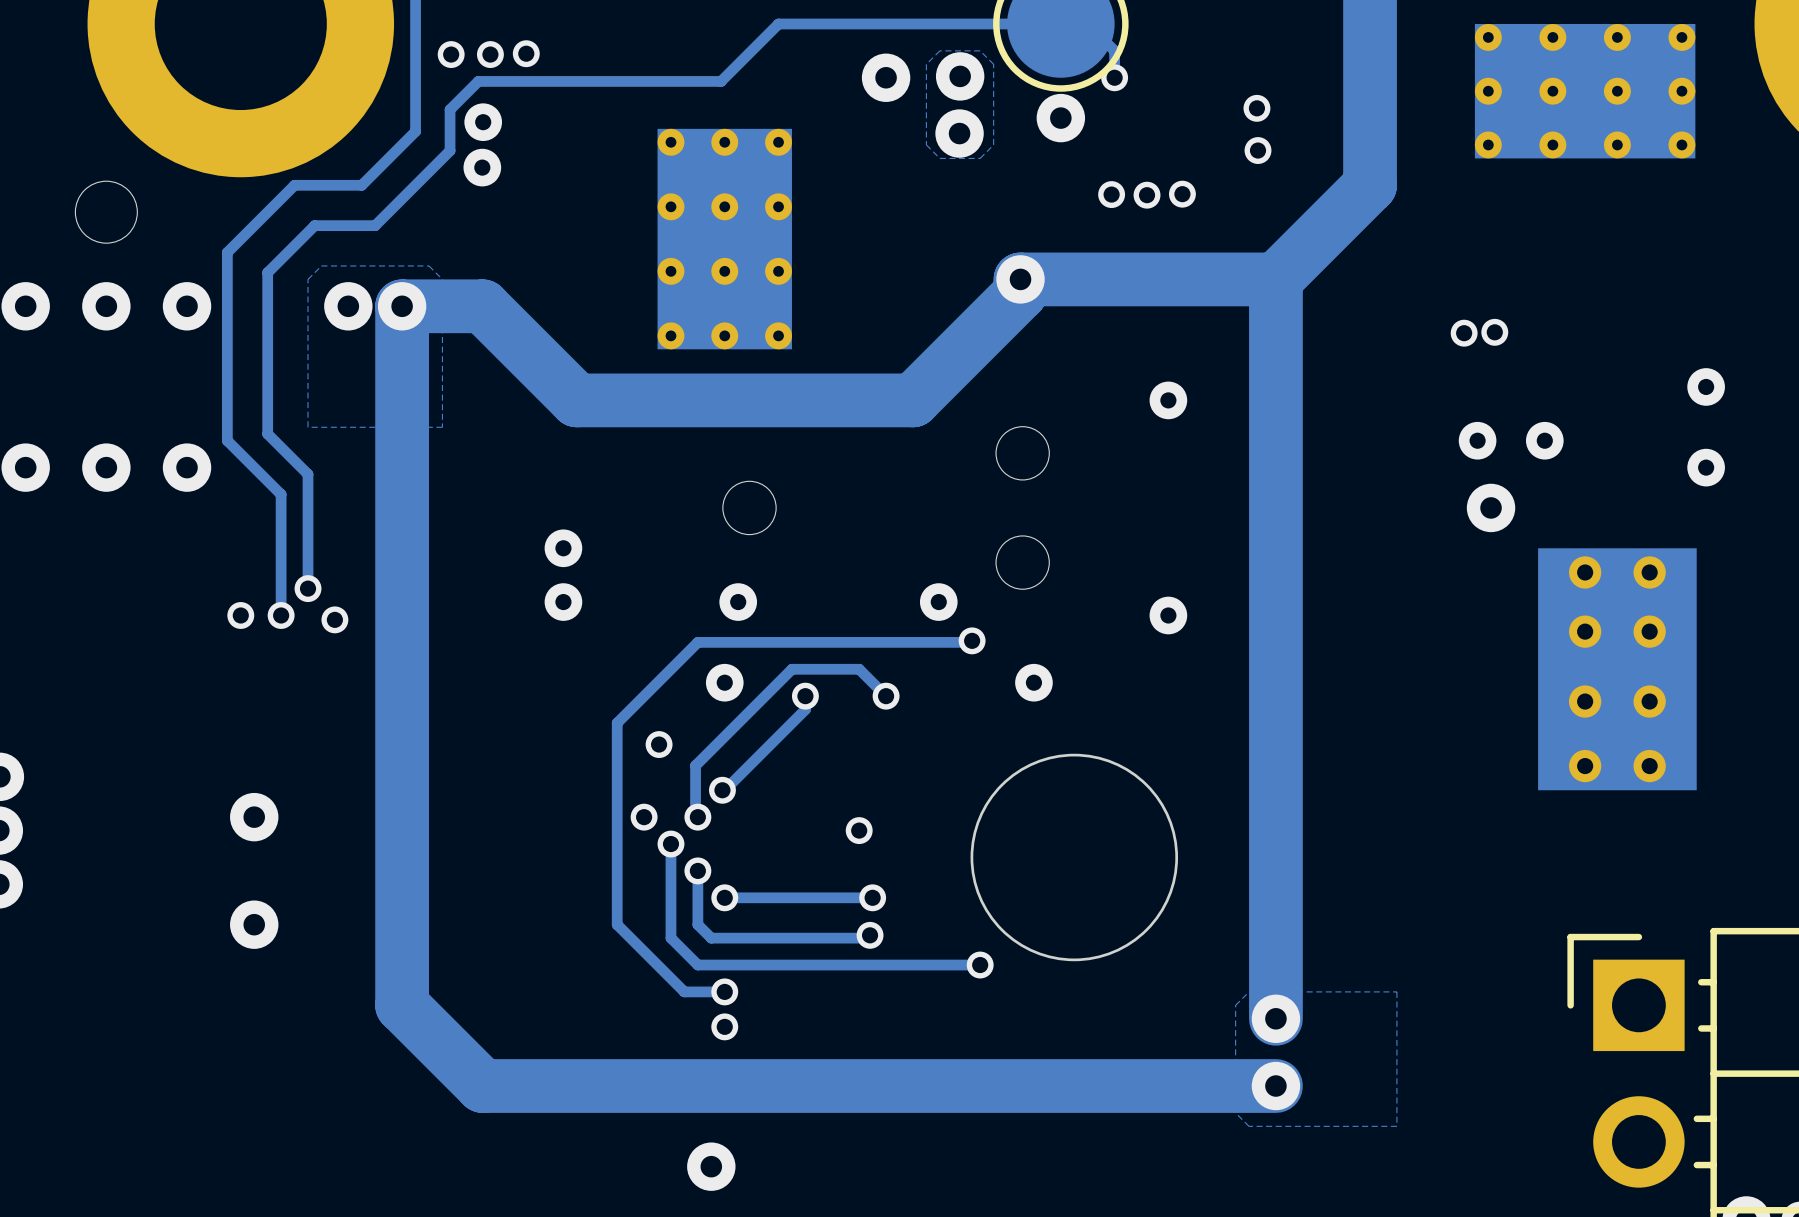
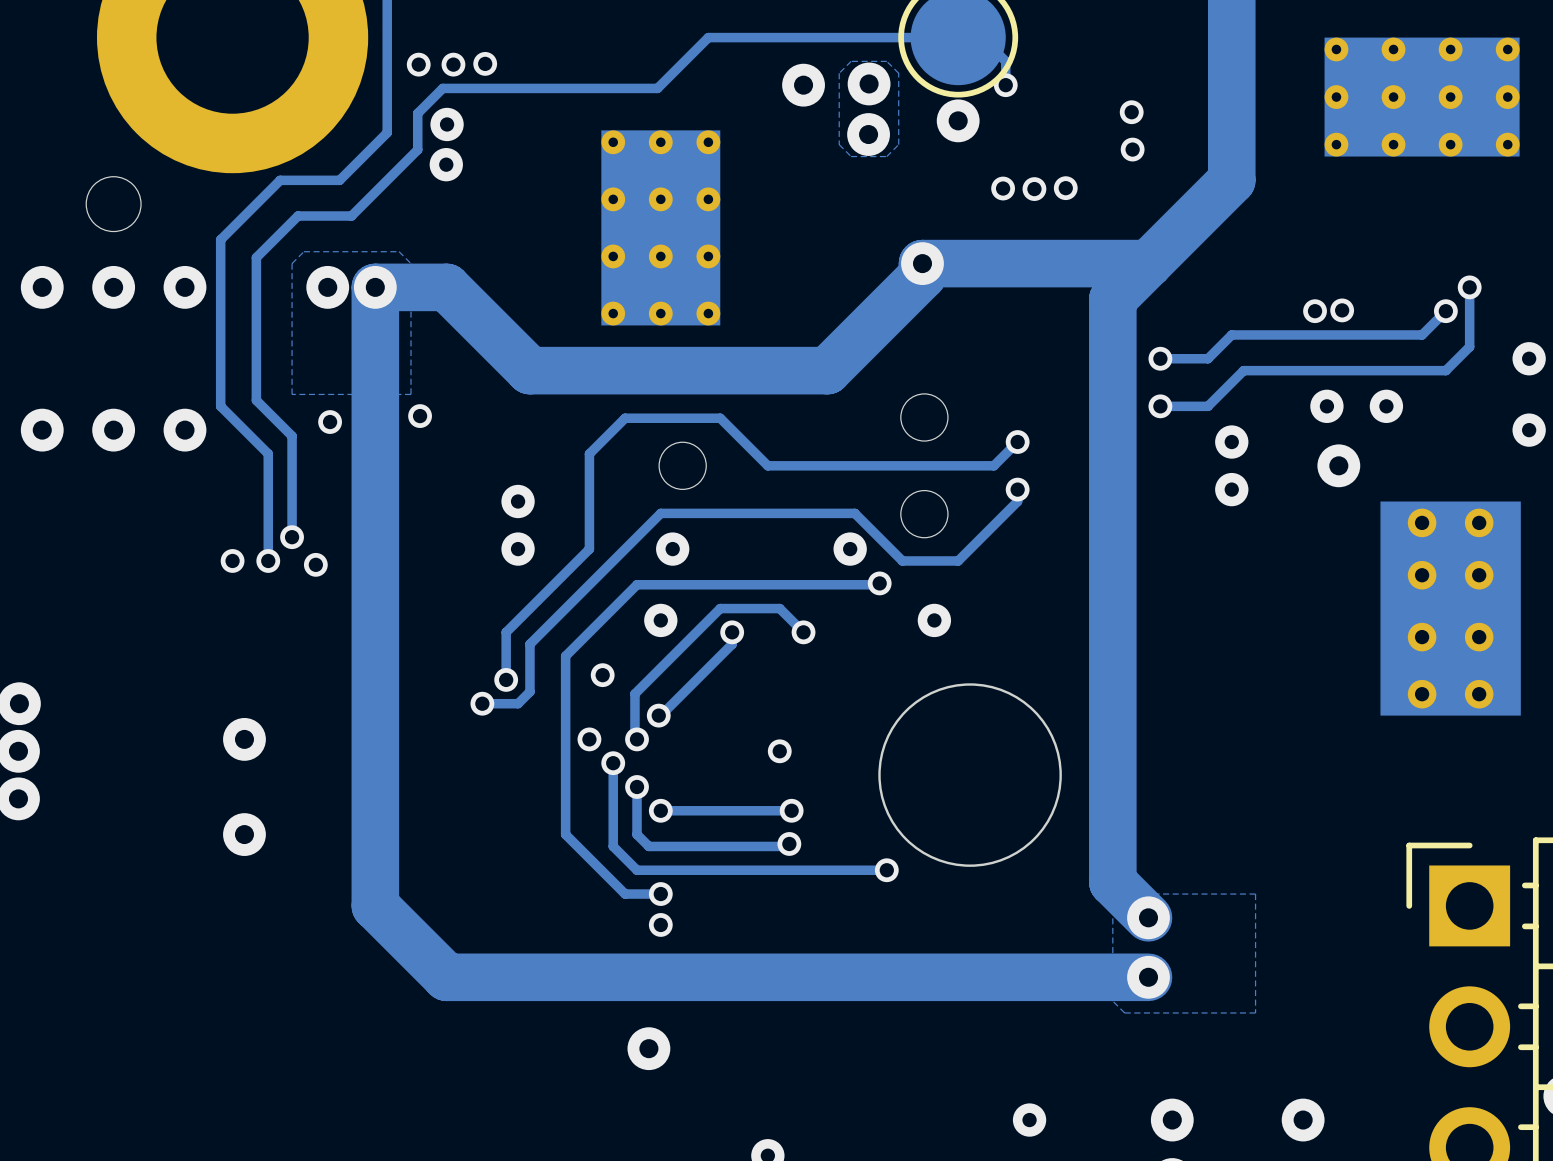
track: (1275, 279) (1275, 1018) -> (1148, 263) (1112, 299) (1112, 882) (1148, 917)
track: none -> (1469, 287) (1469, 346) (1445, 370) (1243, 370) (1207, 406) (1160, 406)
via: none -> (1469, 287)
track: none -> (1445, 311) (1422, 334) (1231, 334) (1207, 358) (1160, 358)
via: none -> (1445, 311)
via: none -> (1160, 358)
via: (1168, 400) -> none
via: none -> (1160, 406)
via: none -> (420, 416)
via: none -> (330, 422)
track: none -> (1017, 442) (993, 465) (767, 465) (720, 418) (625, 418) (589, 453) (589, 549) (506, 632) (506, 679)
via: none -> (1017, 442)
via: none -> (1231, 442)
track: none -> (1017, 489) (1017, 501) (958, 560) (902, 560) (854, 513) (660, 513) (529, 644) (529, 691) (518, 703) (482, 703)
via: none -> (1017, 489)
via: none -> (1231, 489)
via: (1168, 615) -> none
via: none -> (506, 679)
via: none -> (482, 703)

